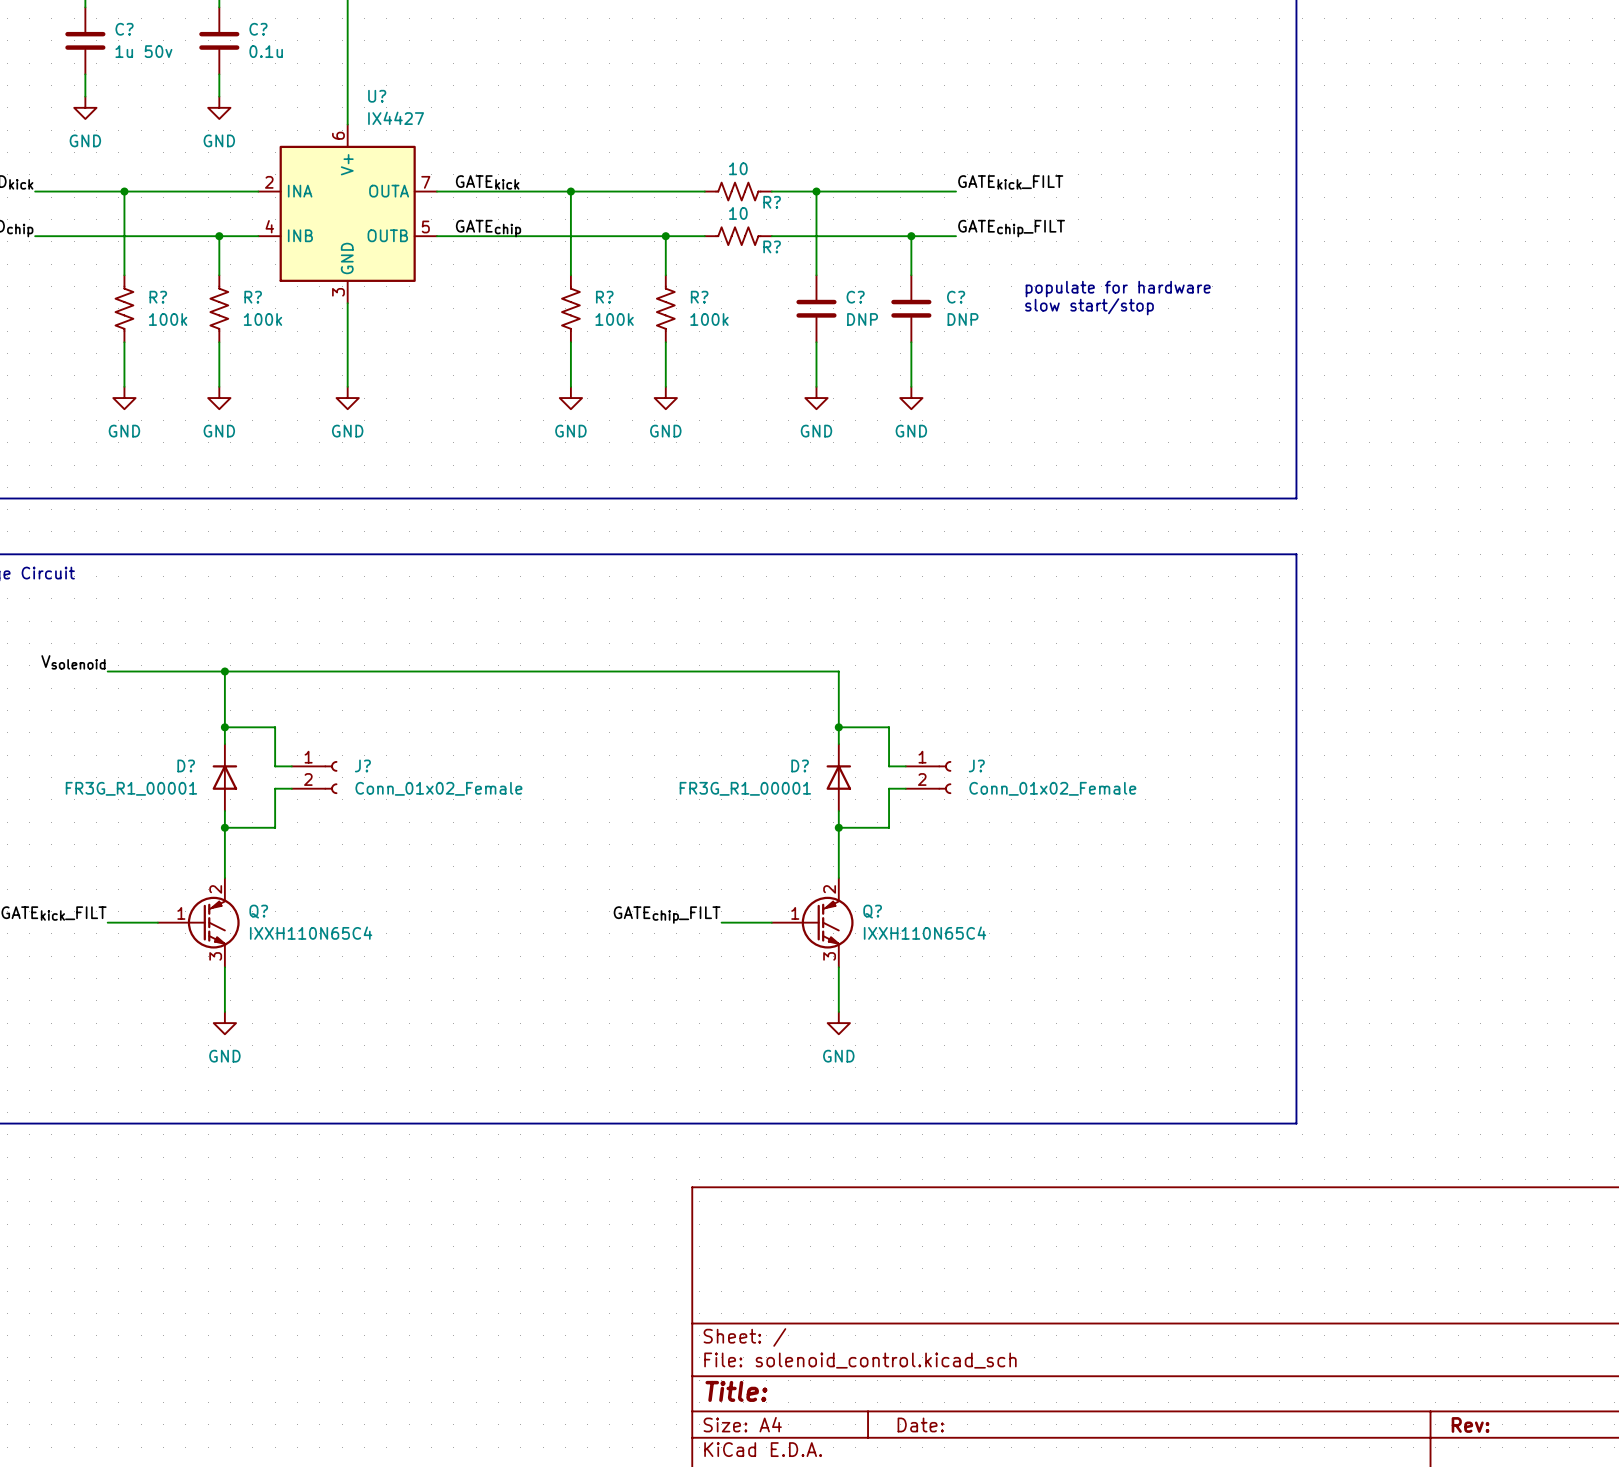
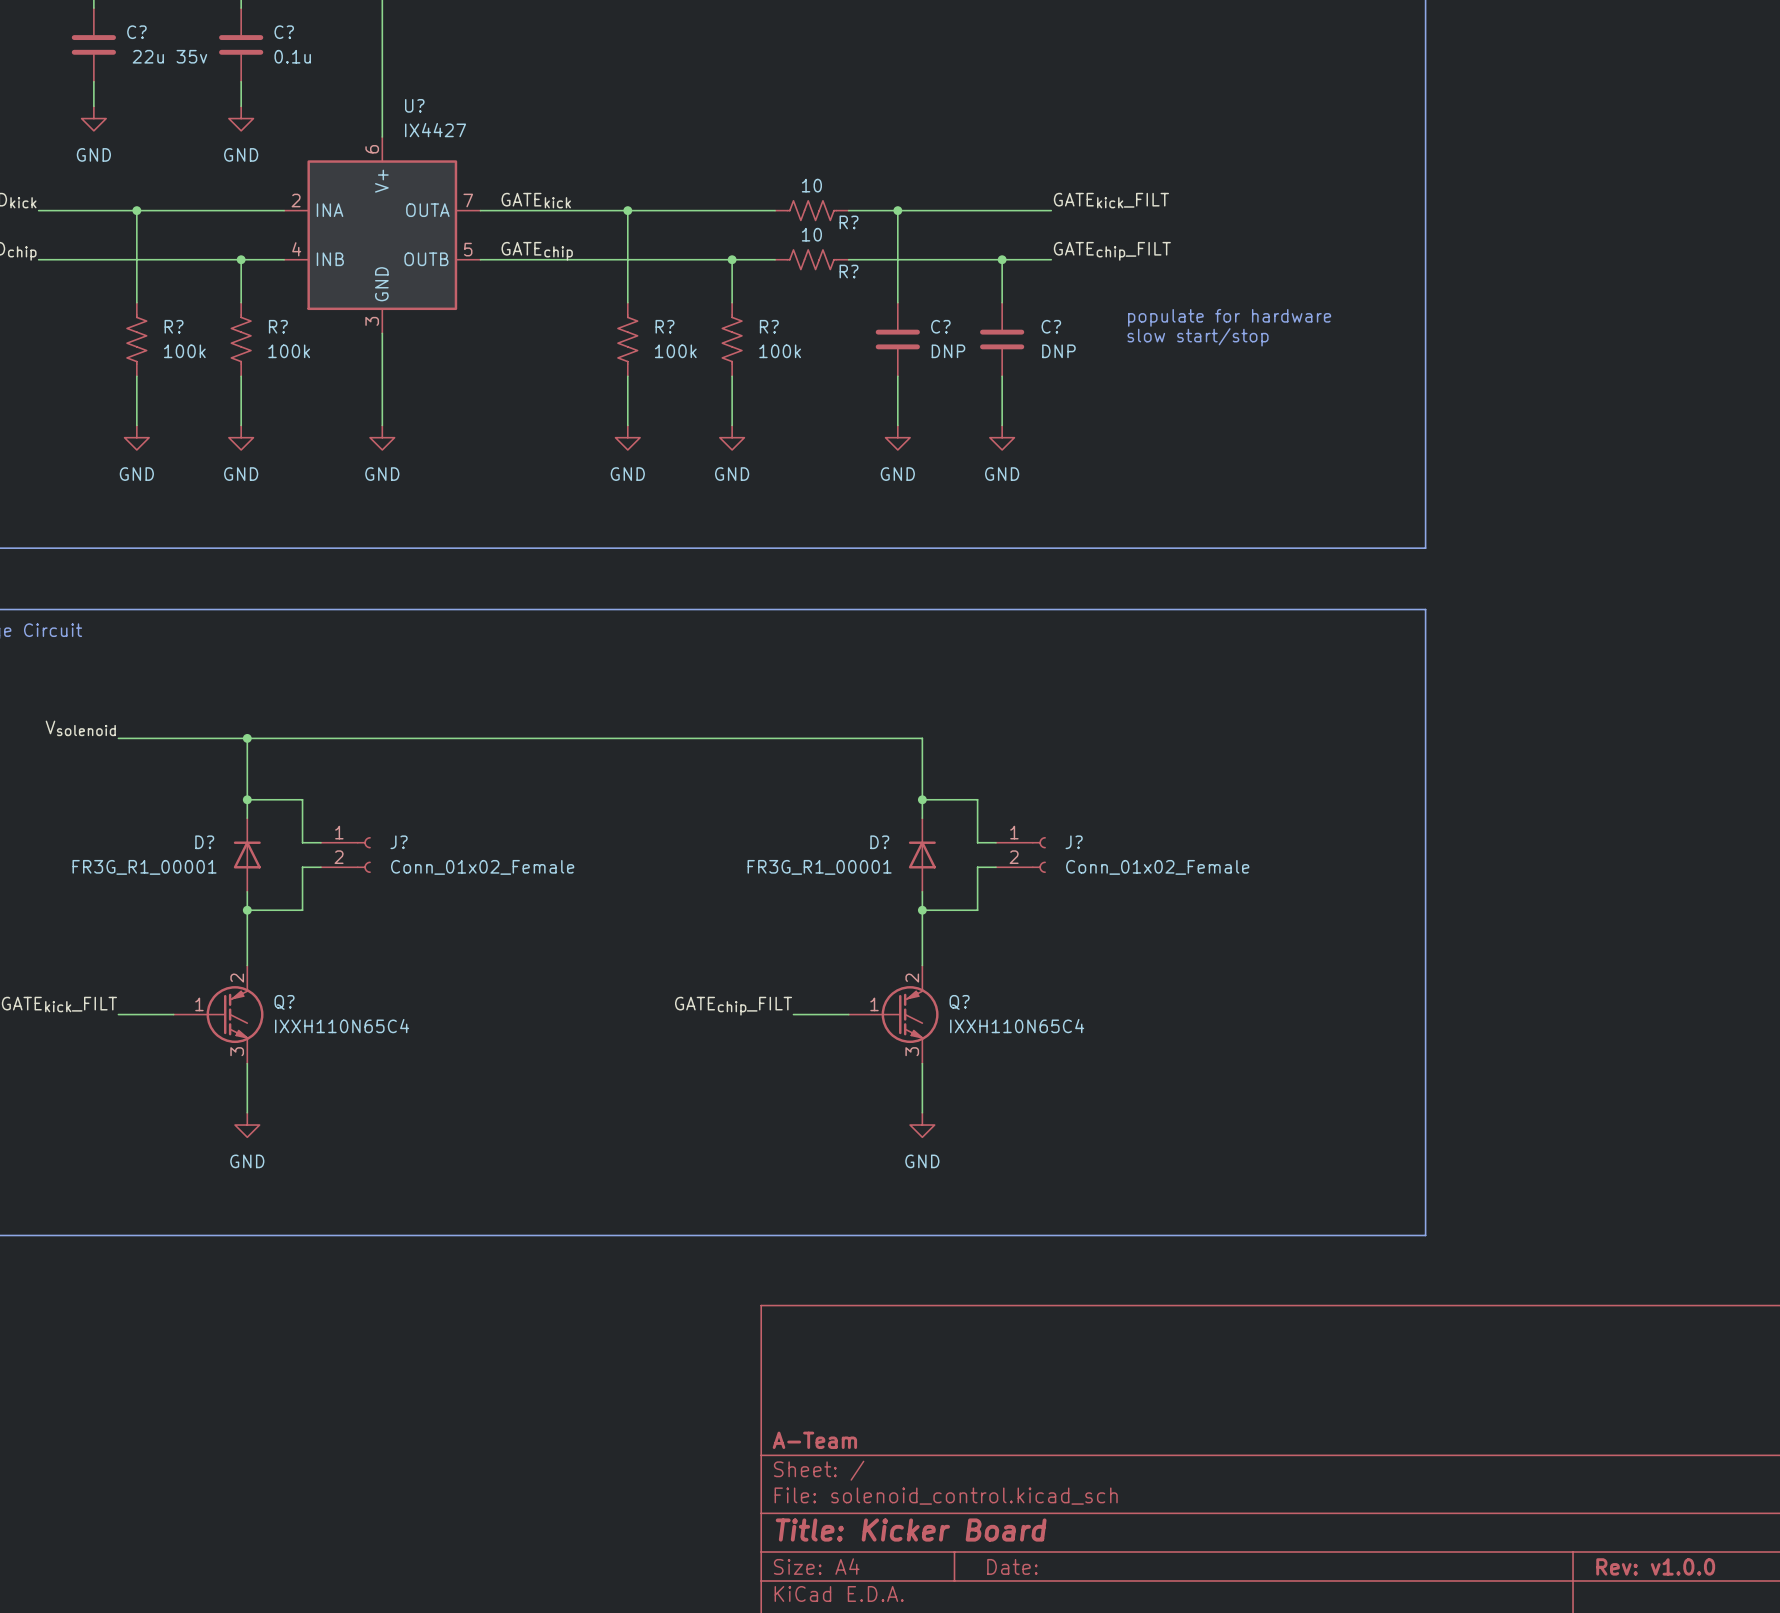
C? value: 1u 50v (143, 51) -> 22u 35v (169, 56)
title block: none -> A-Team (814, 1440)
title block: Title: (736, 1391) -> Title: Kicker Board (911, 1530)
title block: Rev: (1470, 1424) -> Rev: v1.0.0 (1655, 1566)

